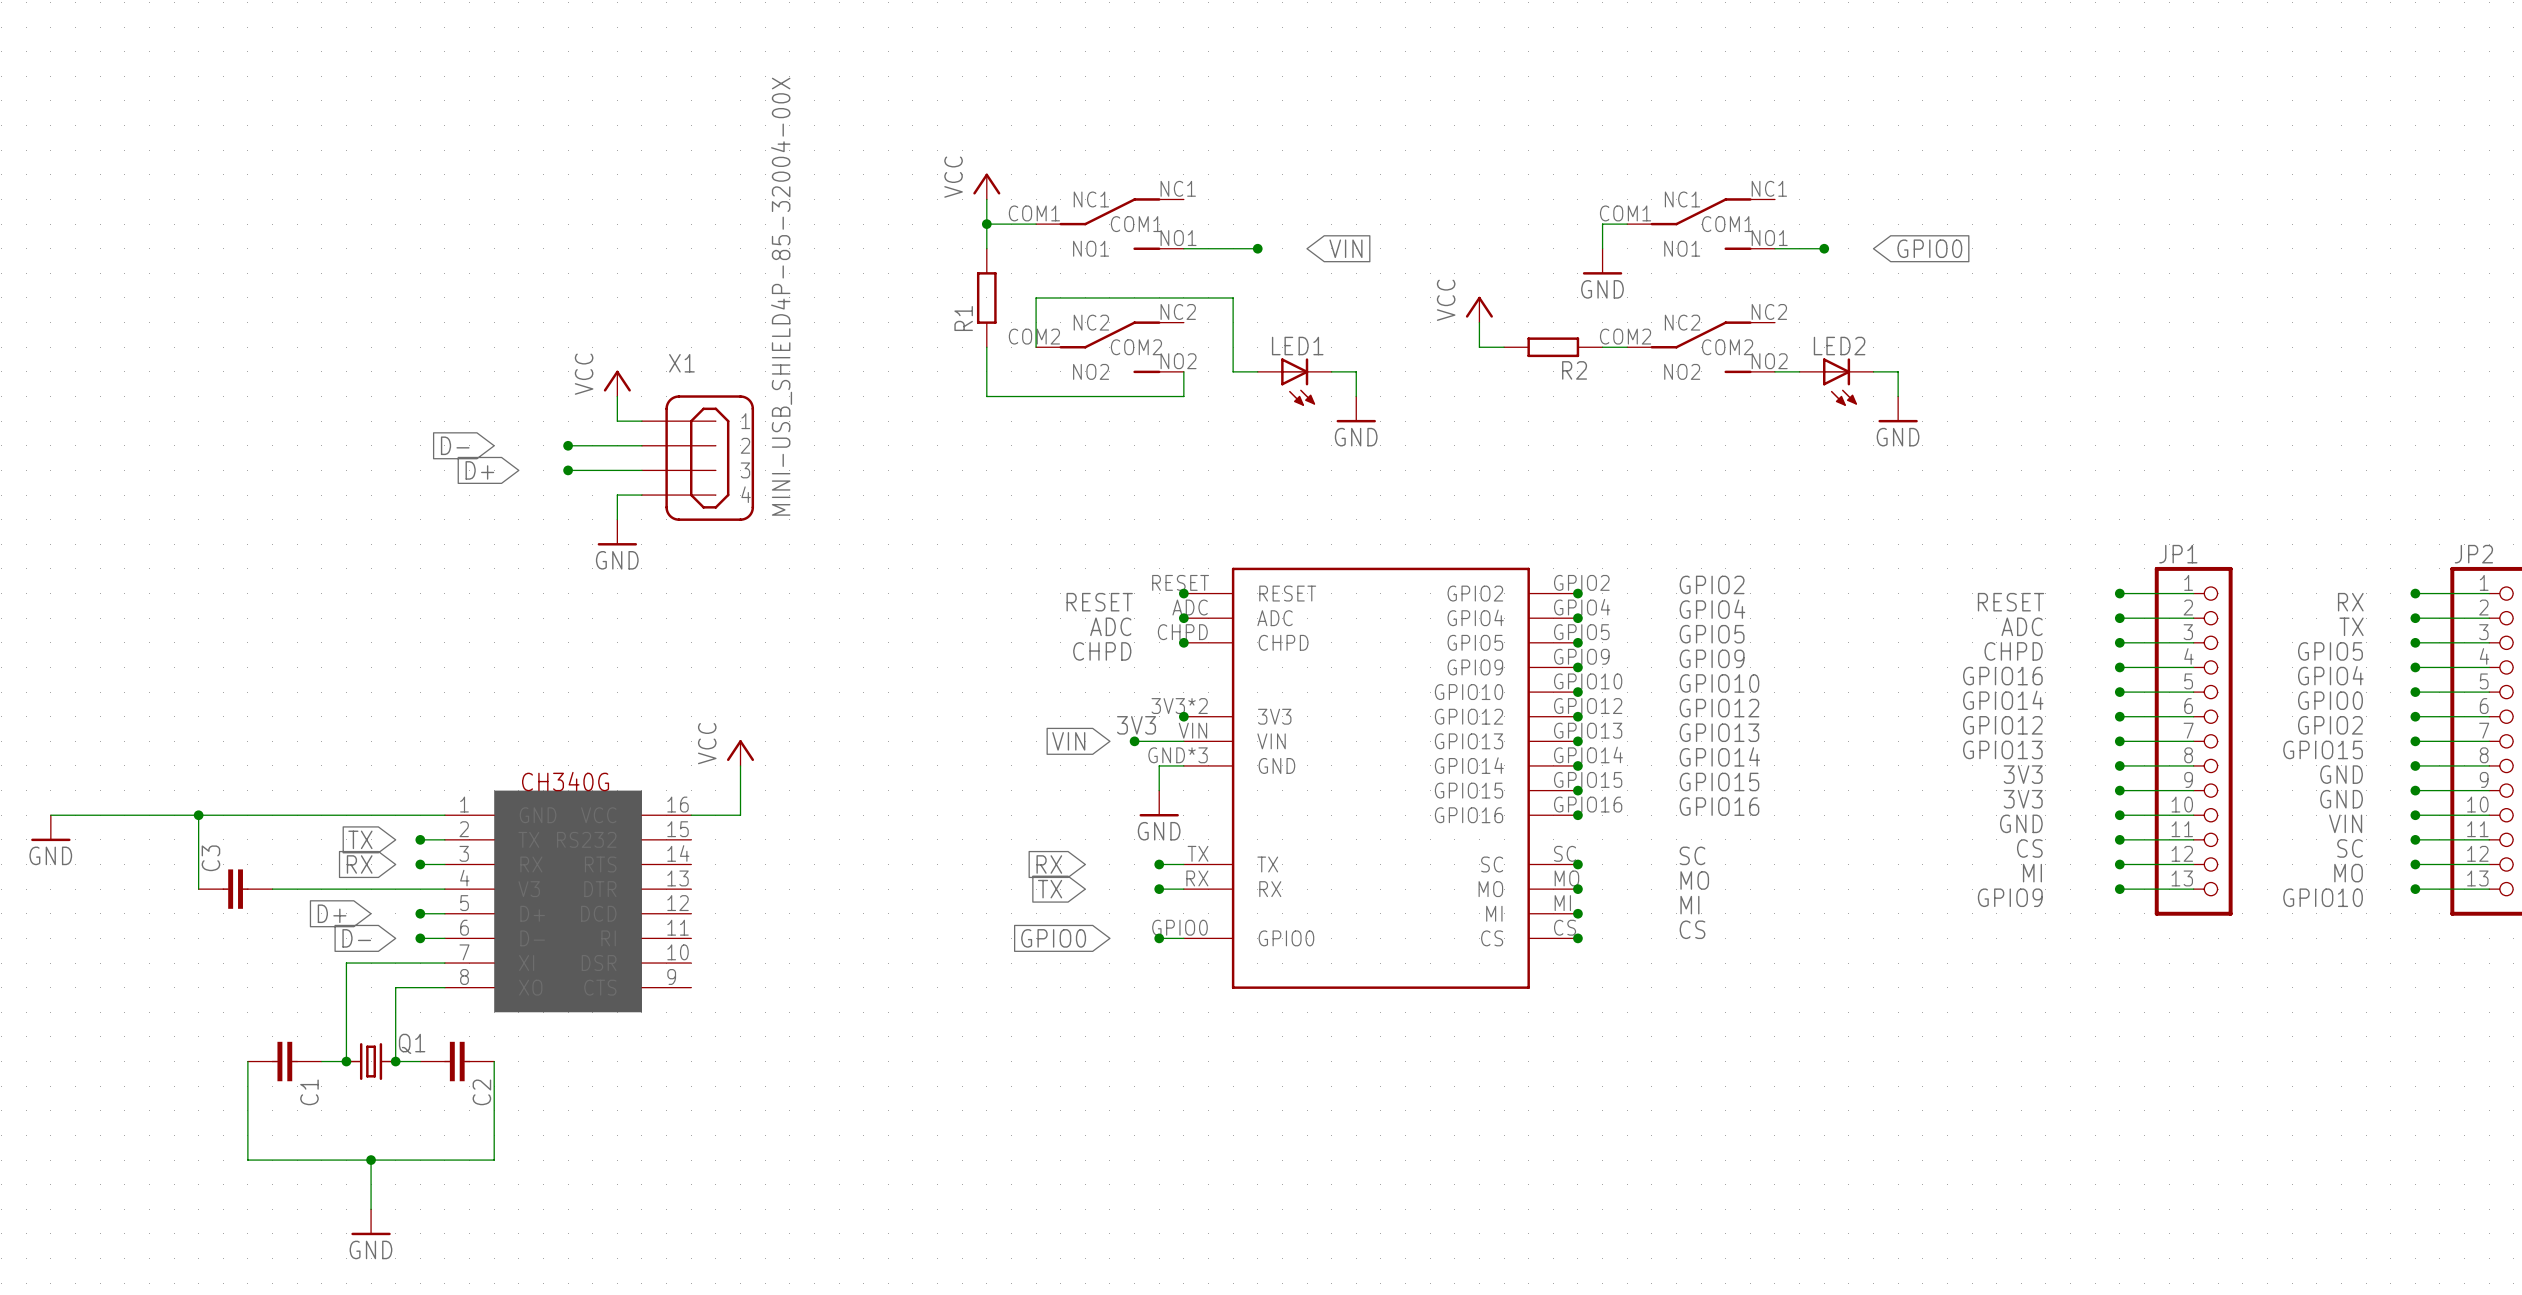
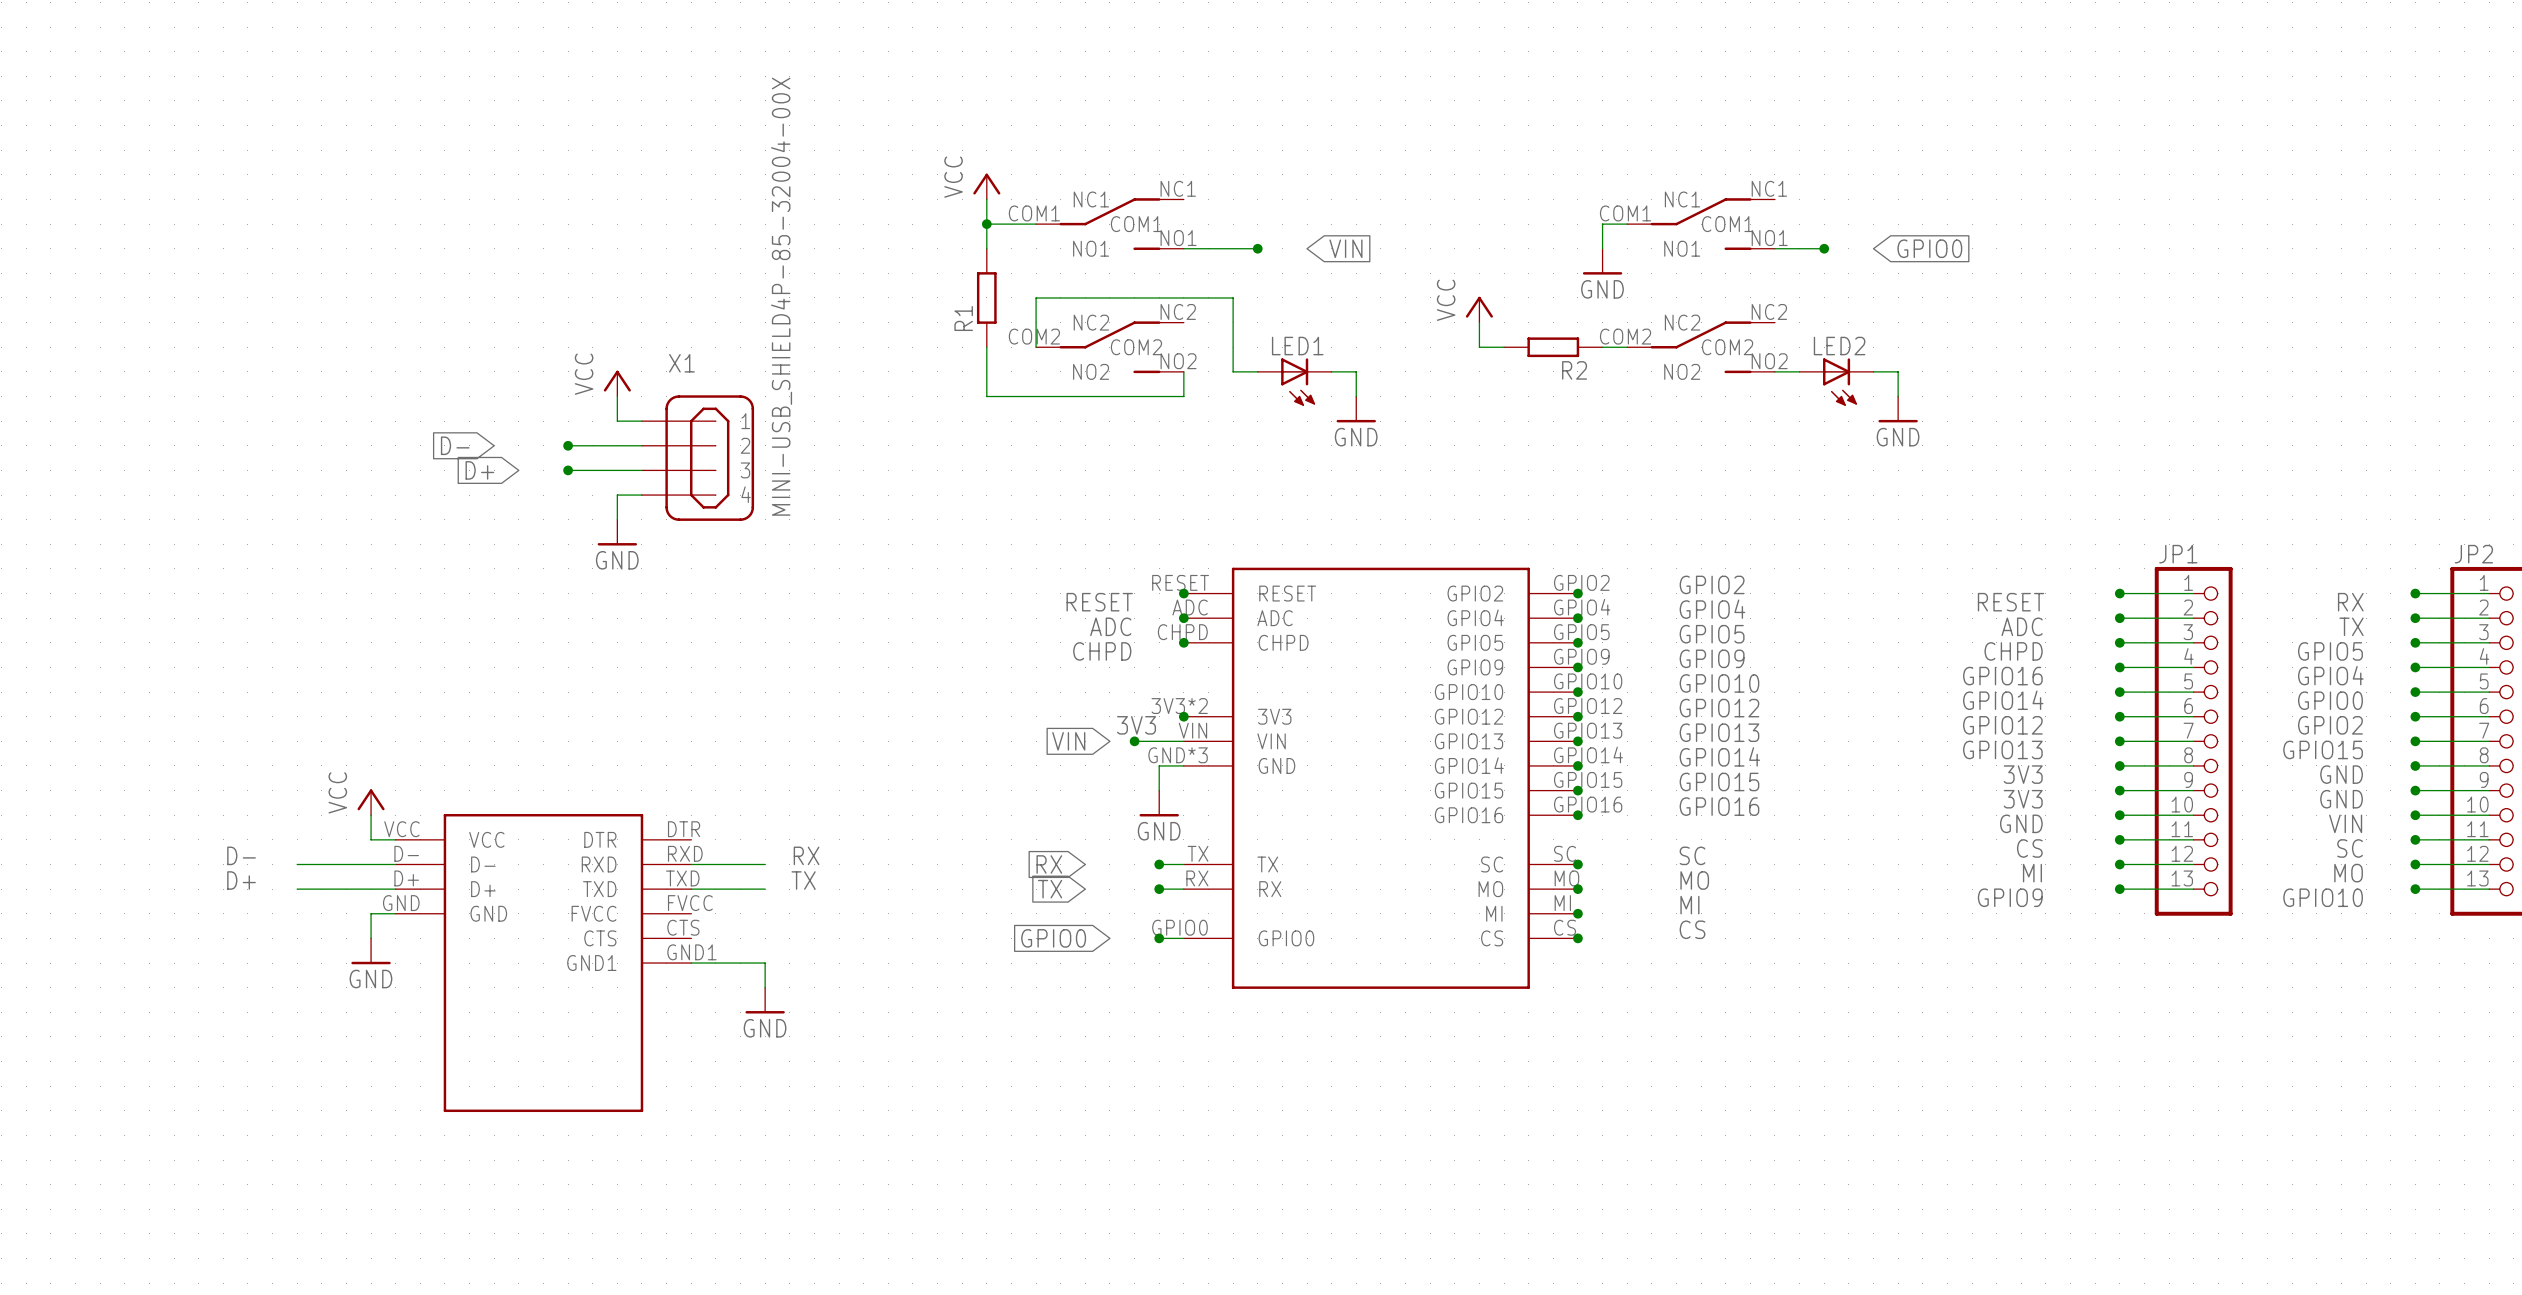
power symbol: VCC (740, 753) -> none
wire: (740, 765) (740, 815) (691, 815) -> none
power symbol: none -> VCC (371, 802)
wire: (50, 815) (444, 815) -> none
wire: (198, 815) (198, 889) -> none
junction: (198, 815) -> none
wire: none -> (371, 815) (371, 839) (395, 839)
power symbol: GND (50, 828) -> none
global label: TX (360, 839) -> none
junction: (420, 839) -> none
label: none -> D- (241, 855)
label: none -> RX (806, 855)
wire: none -> (297, 864) (395, 864)
global label: RX (359, 864) -> none
junction: (420, 864) -> none
wire: none -> (691, 864) (765, 864)
label: none -> D+ (241, 880)
label: none -> TX (803, 880)
C3: (235, 889) -> none
wire: (272, 889) (297, 889) -> none
wire: none -> (691, 889) (765, 889)
part: (568, 901) -> none
global label: D+ (332, 913) -> none
wire: none -> (395, 913) (371, 913) (371, 938)
junction: (420, 913) -> none
global label: D- (356, 938) -> none
wire: (420, 938) (444, 938) -> none
junction: (420, 938) -> none
power symbol: none -> GND (371, 951)
wire: (444, 963) (346, 963) (346, 1061) (321, 1061) -> none
part: none -> (543, 963)
wire: none -> (691, 963) (765, 963) (765, 987)
wire: (444, 987) (395, 987) (395, 1061) (420, 1061) -> none
power symbol: none -> GND (765, 1000)
wire: (247, 1061) (247, 1160) (494, 1160) (494, 1061) -> none
C1: (284, 1061) -> none
junction: (346, 1061) -> none
Q1: (371, 1061) -> none
junction: (395, 1061) -> none
C2: (457, 1061) -> none
wire: (371, 1160) (371, 1209) -> none
junction: (371, 1160) -> none
power symbol: GND (371, 1222) -> none

